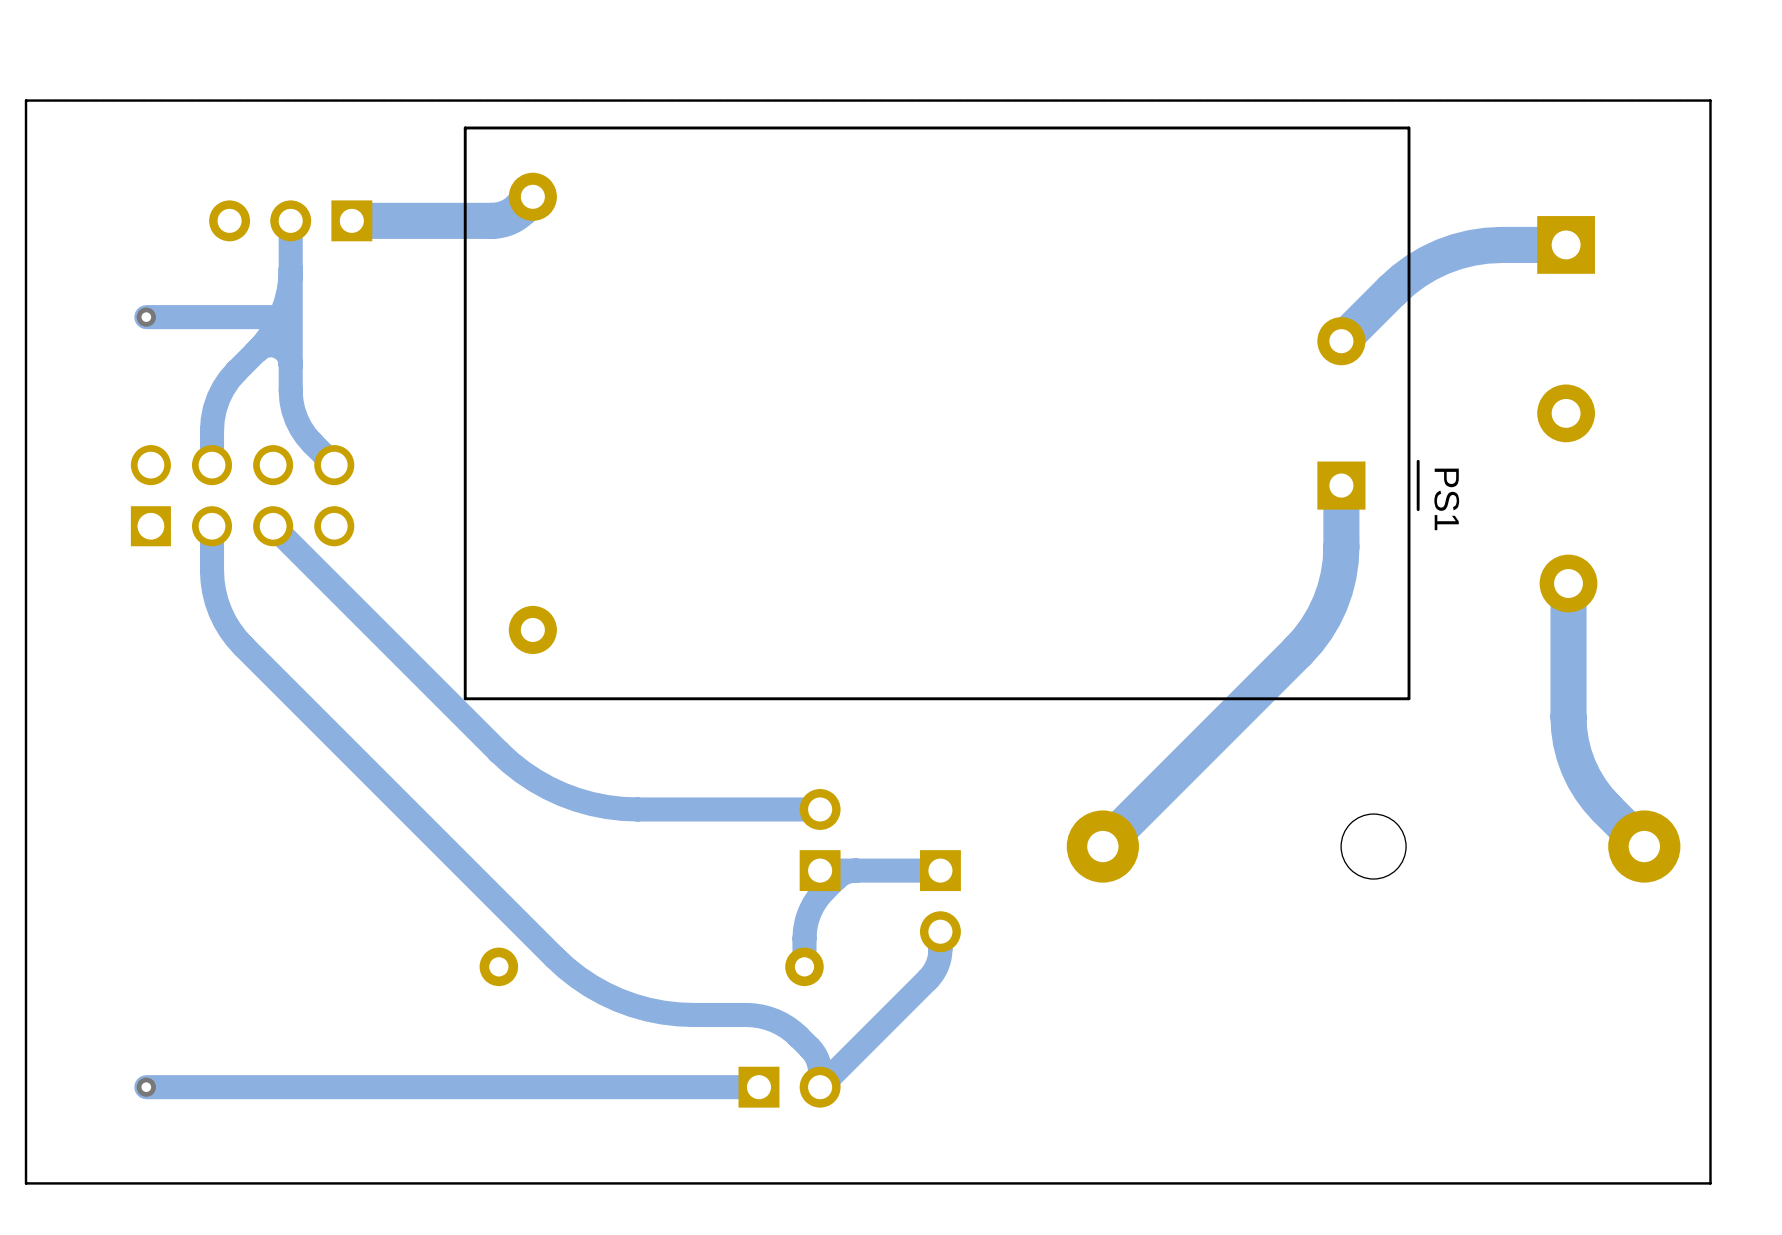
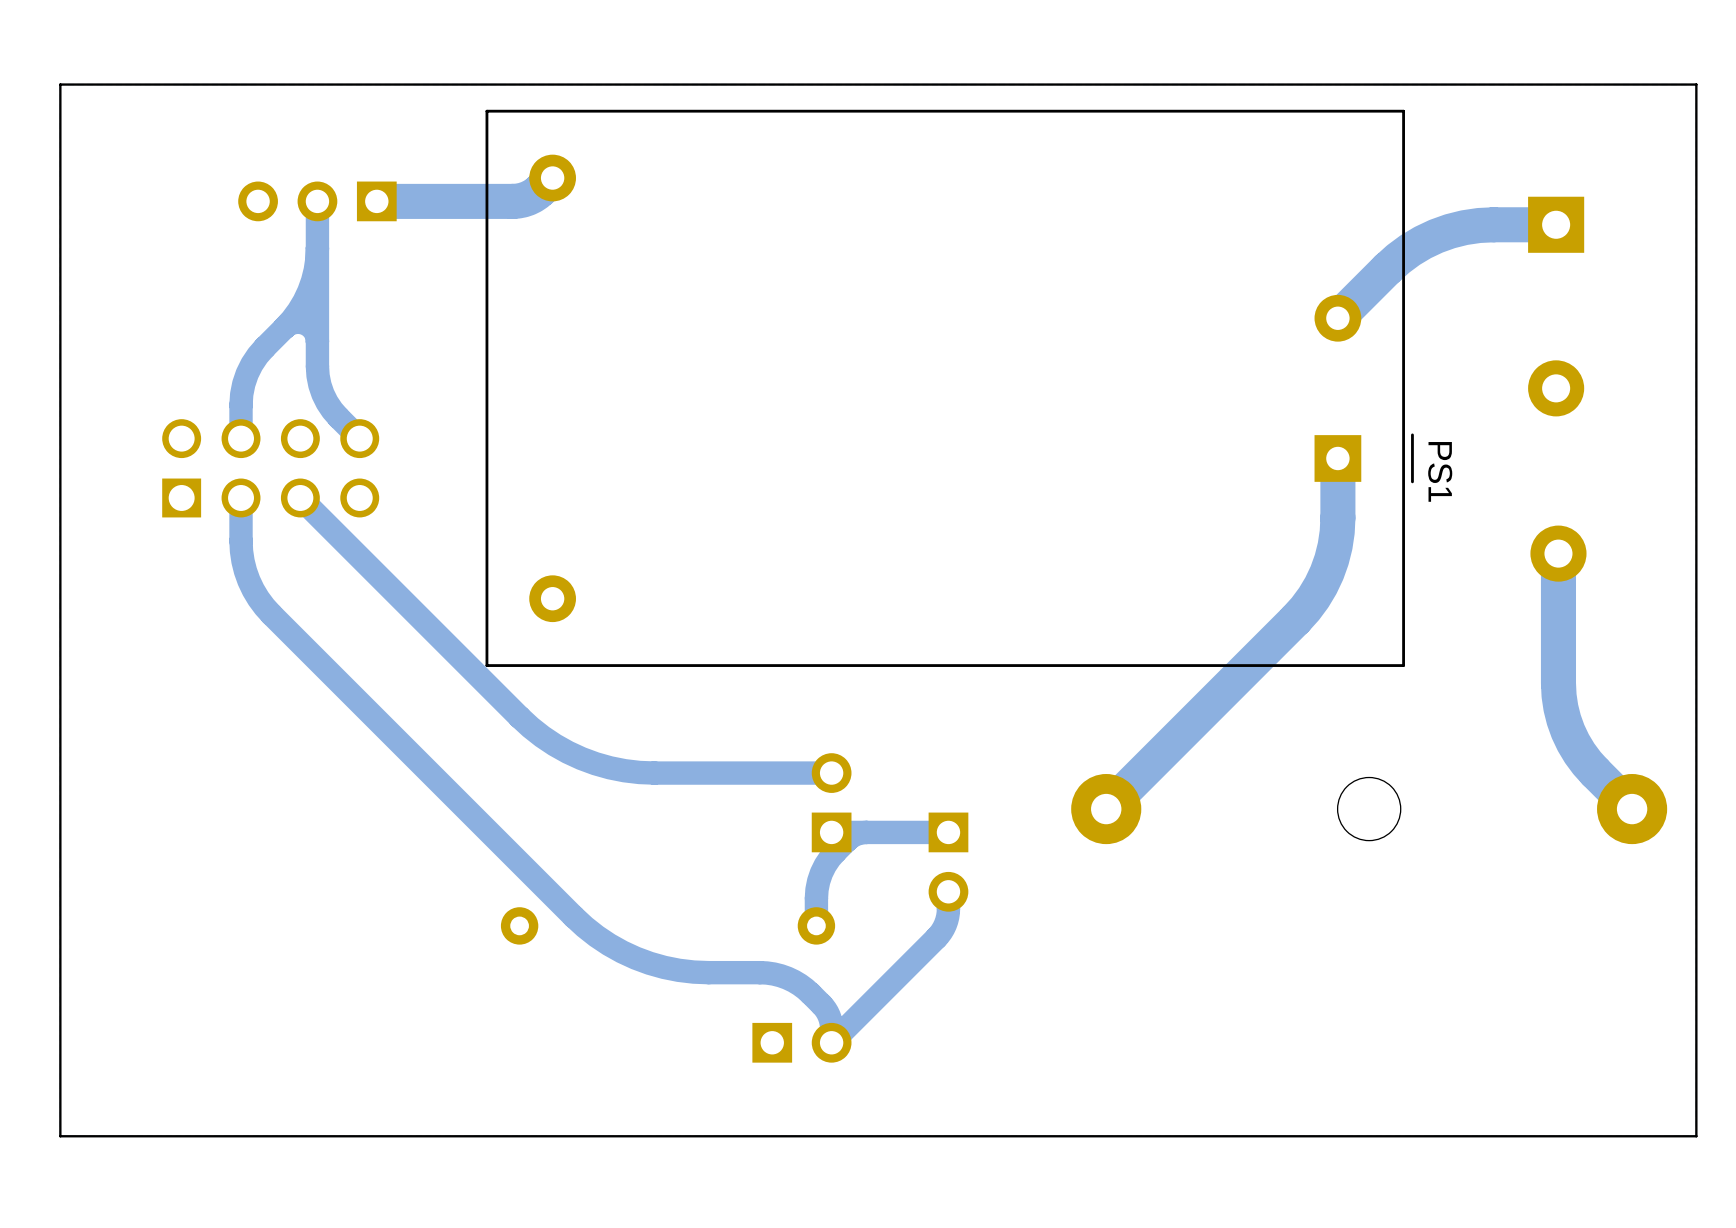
via: (146, 317) -> none
bottom track: (280, 317) (146, 317) -> none
via: (146, 1087) -> none
bottom track: (758, 1087) (146, 1087) -> none

